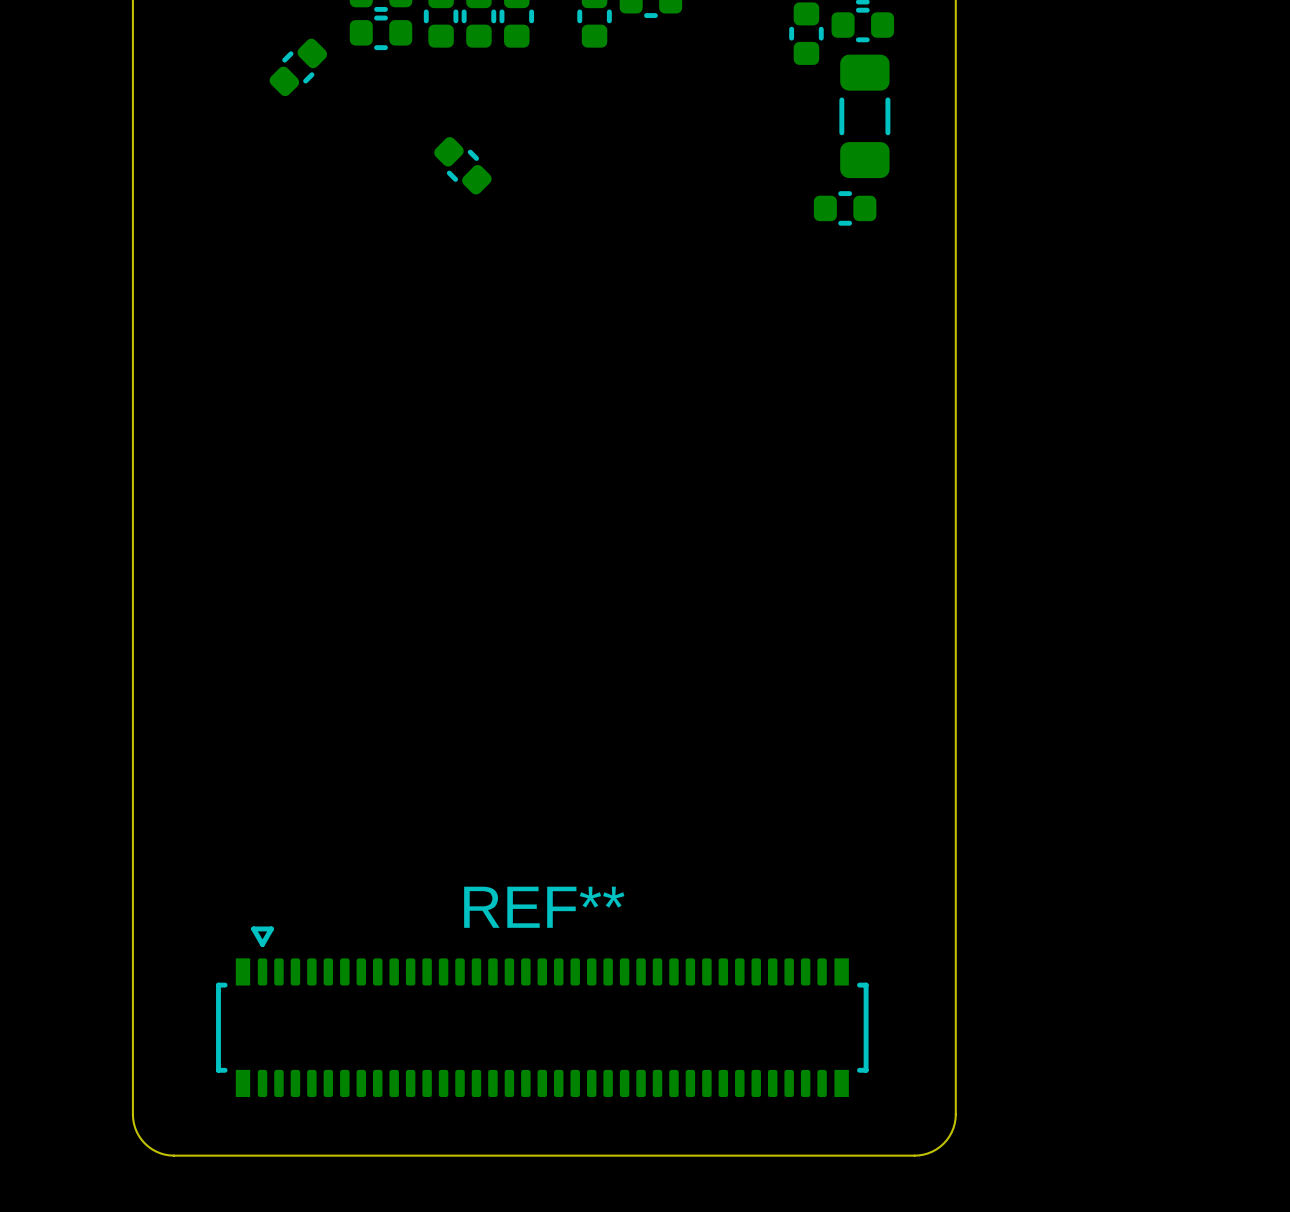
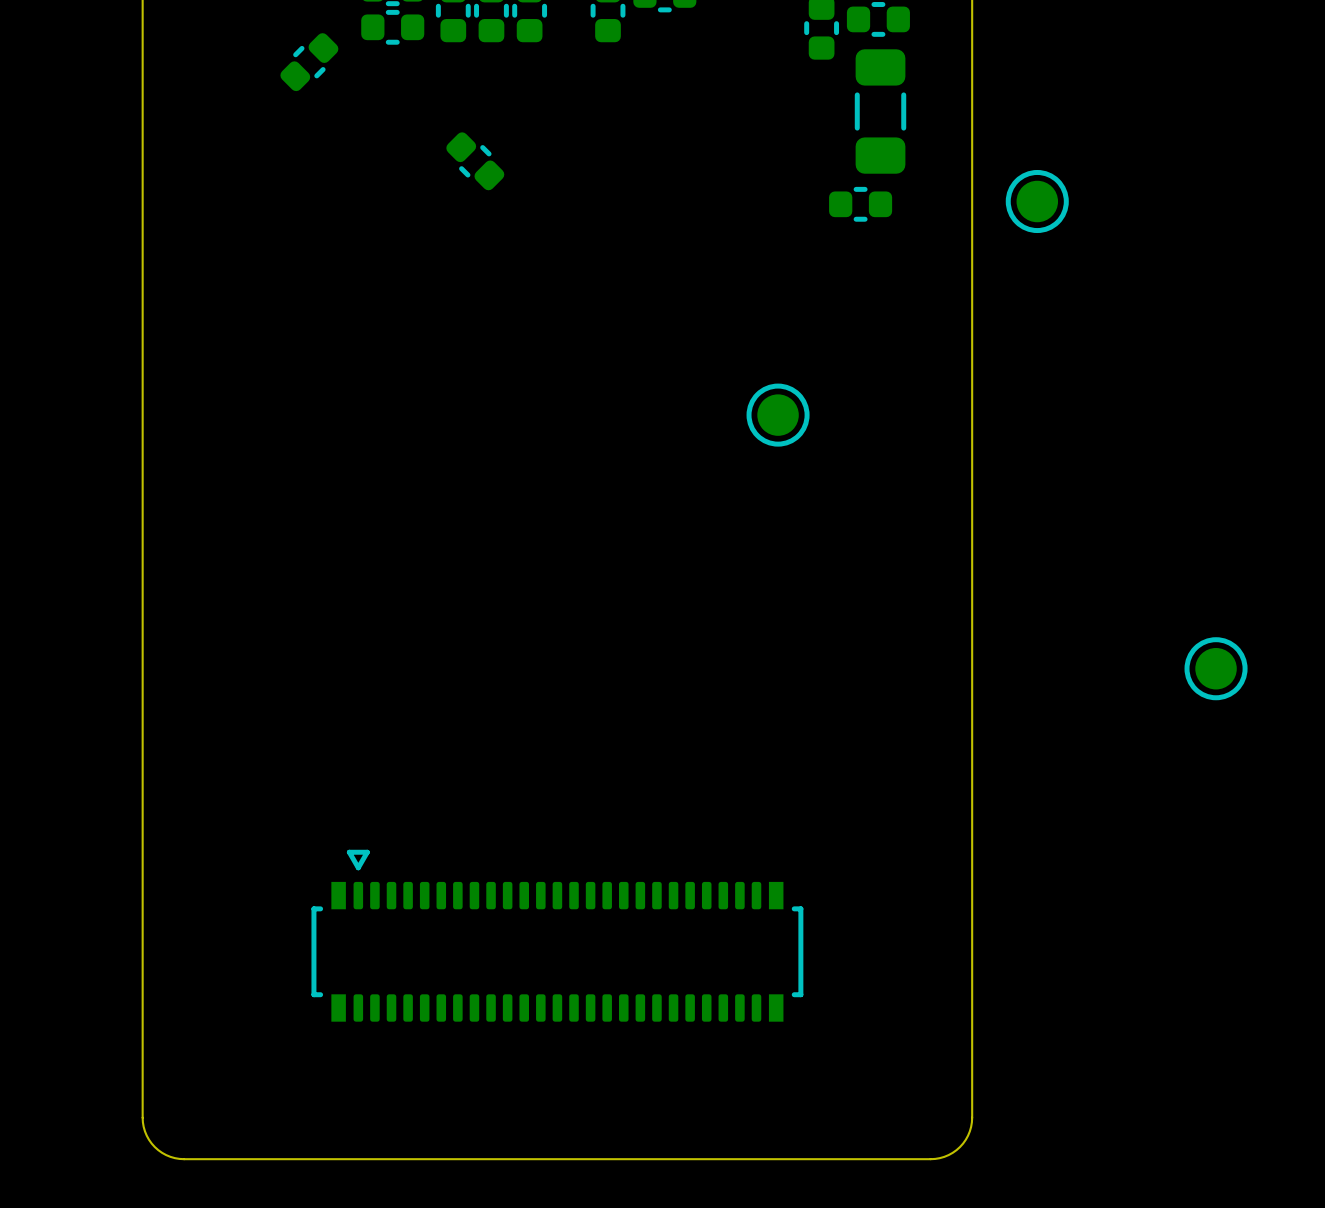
part: none -> (1037, 201)
part: none -> (778, 415)
part: none -> (1216, 668)
part: none -> (557, 935)
REF**: (542, 1011) -> none

